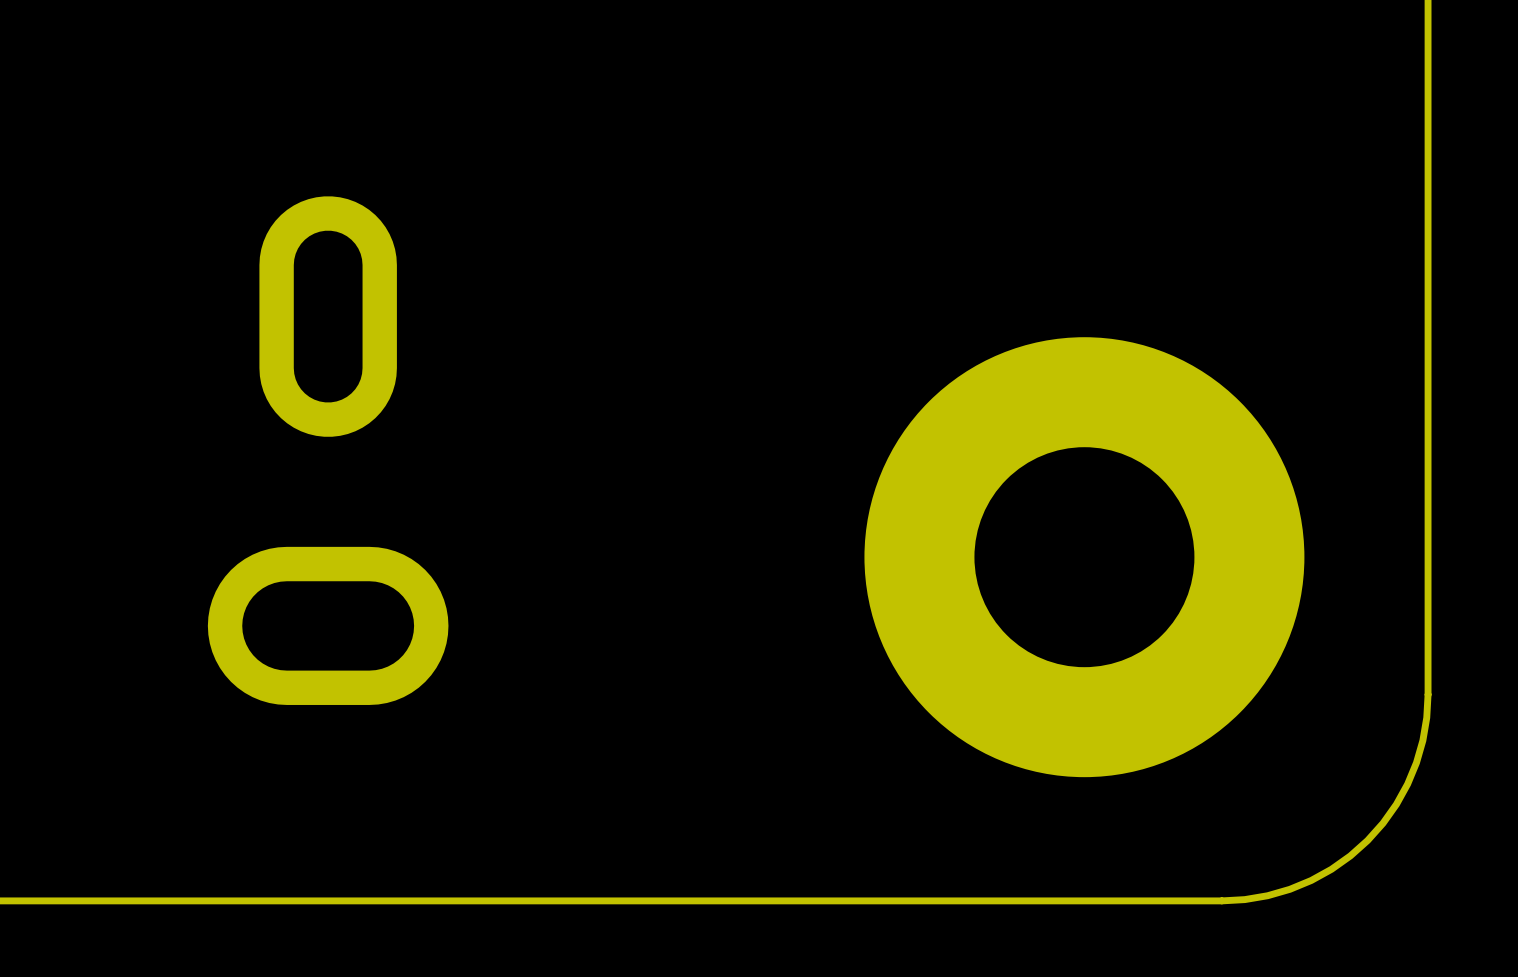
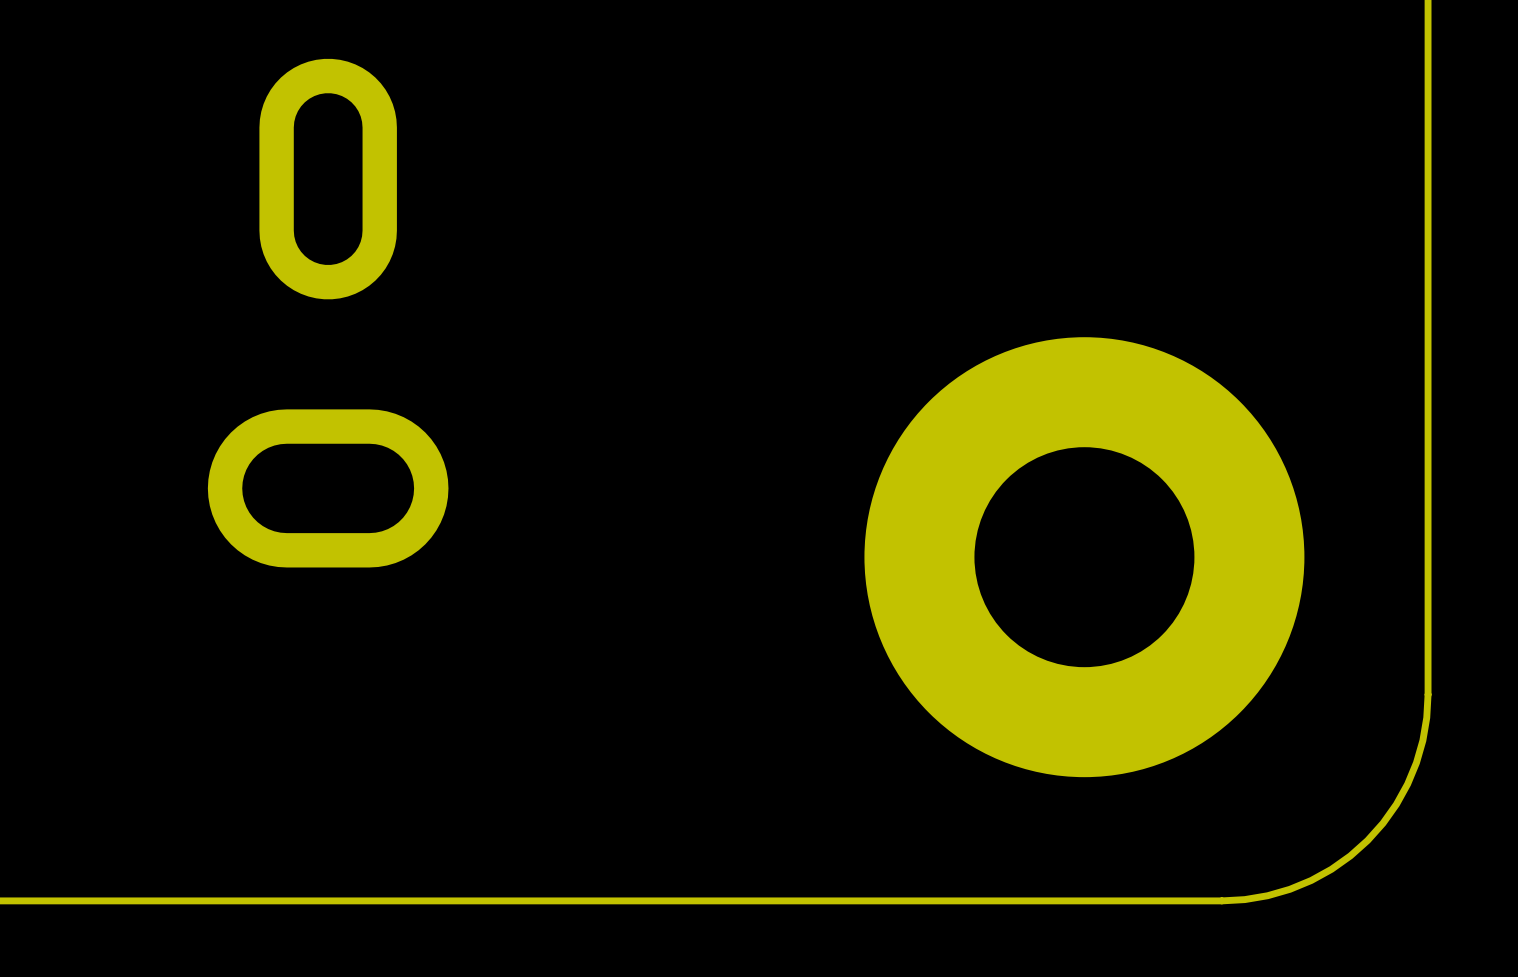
part position: (328, 450) -> (328, 313)

